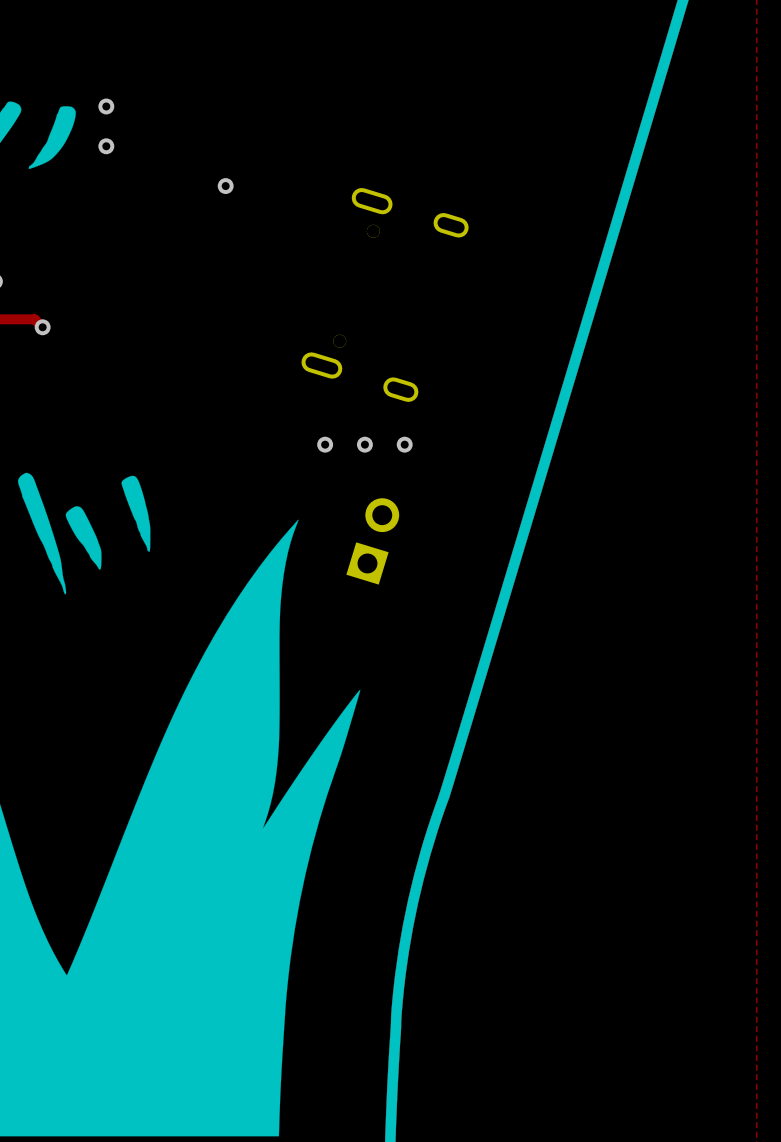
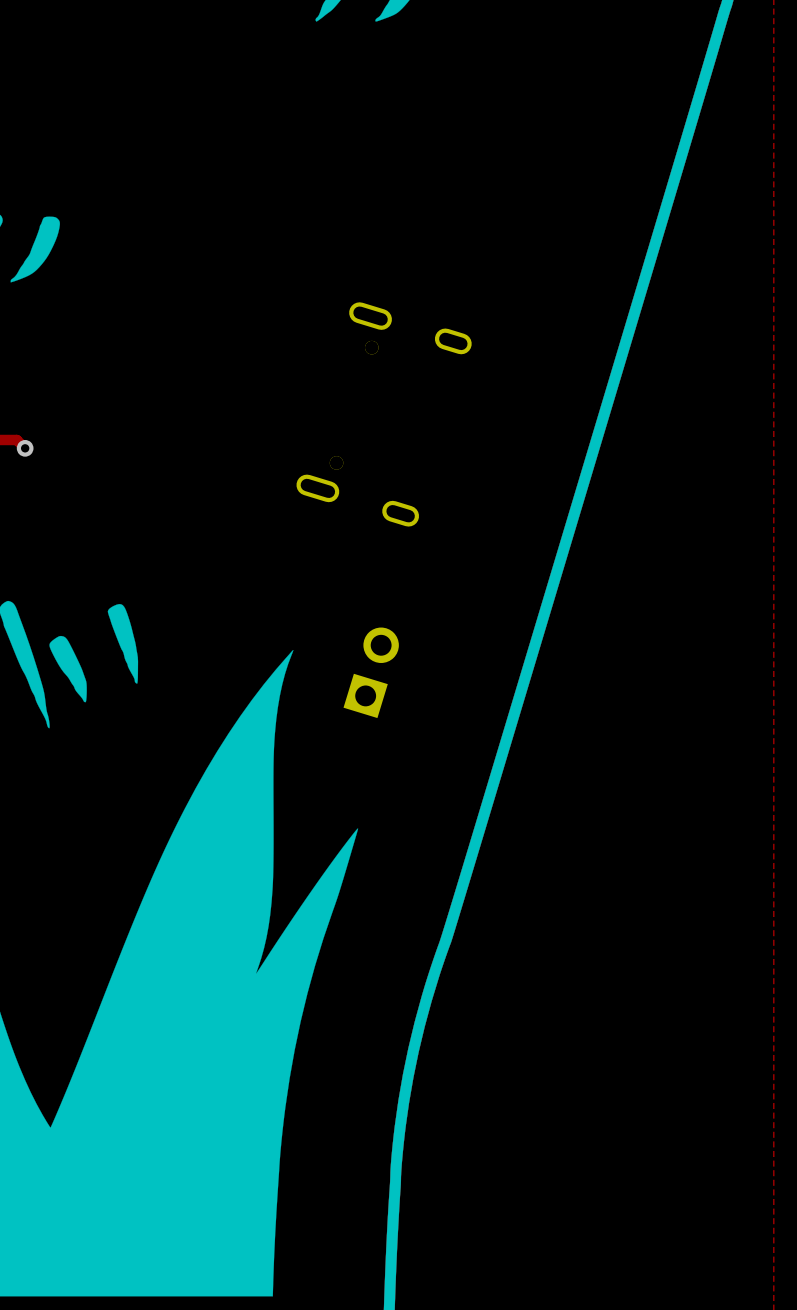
via: (106, 106) -> none
via: (106, 146) -> none
via: (225, 186) -> none
via: (325, 444) -> none
via: (364, 444) -> none
via: (404, 444) -> none

